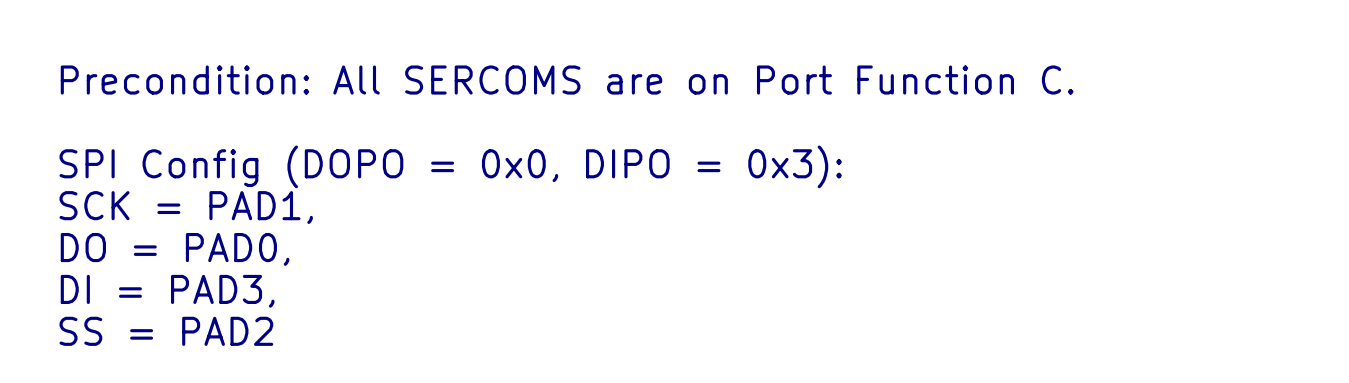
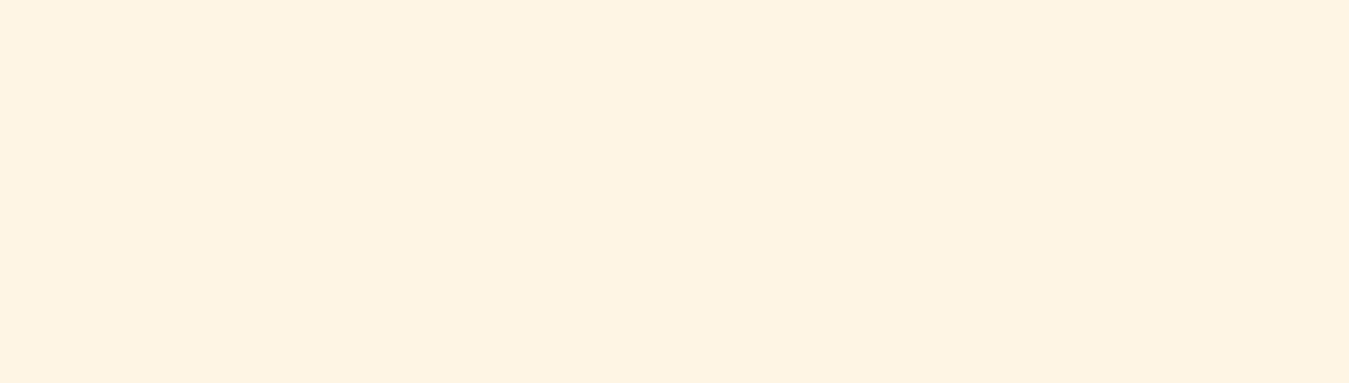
text: Precondition: All SERCOMS are on Port Function C. (567, 80) -> none
text: SPI Config (DOPO = 0x0, DIPO = 0x3): (450, 166) -> none
text: SCK = PAD1, (186, 207) -> none
text: DO = PAD0, (175, 249) -> none
text: DI = PAD3, (167, 291) -> none
text: SS = PAD2 (166, 331) -> none

